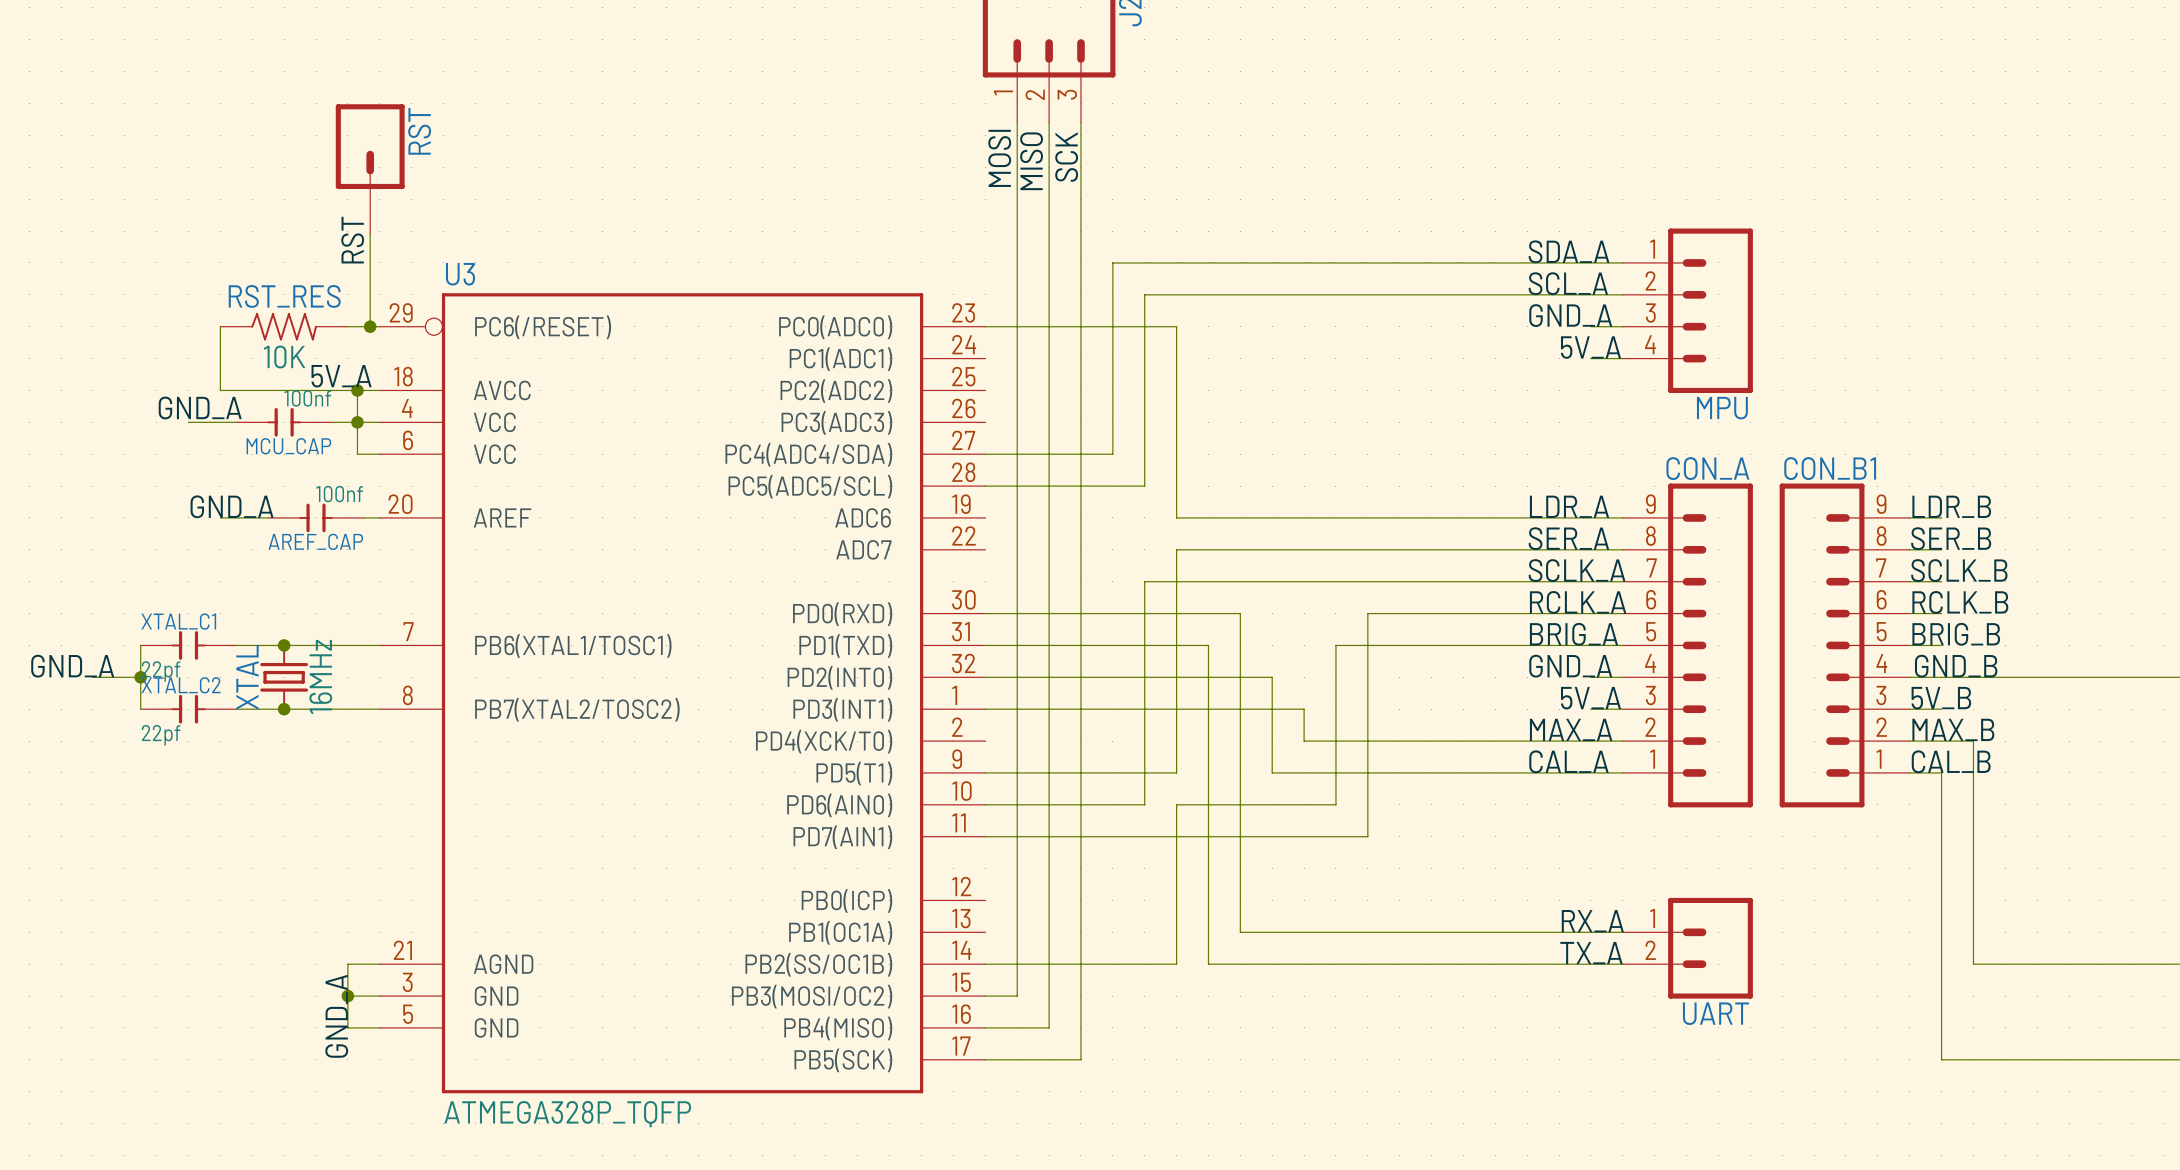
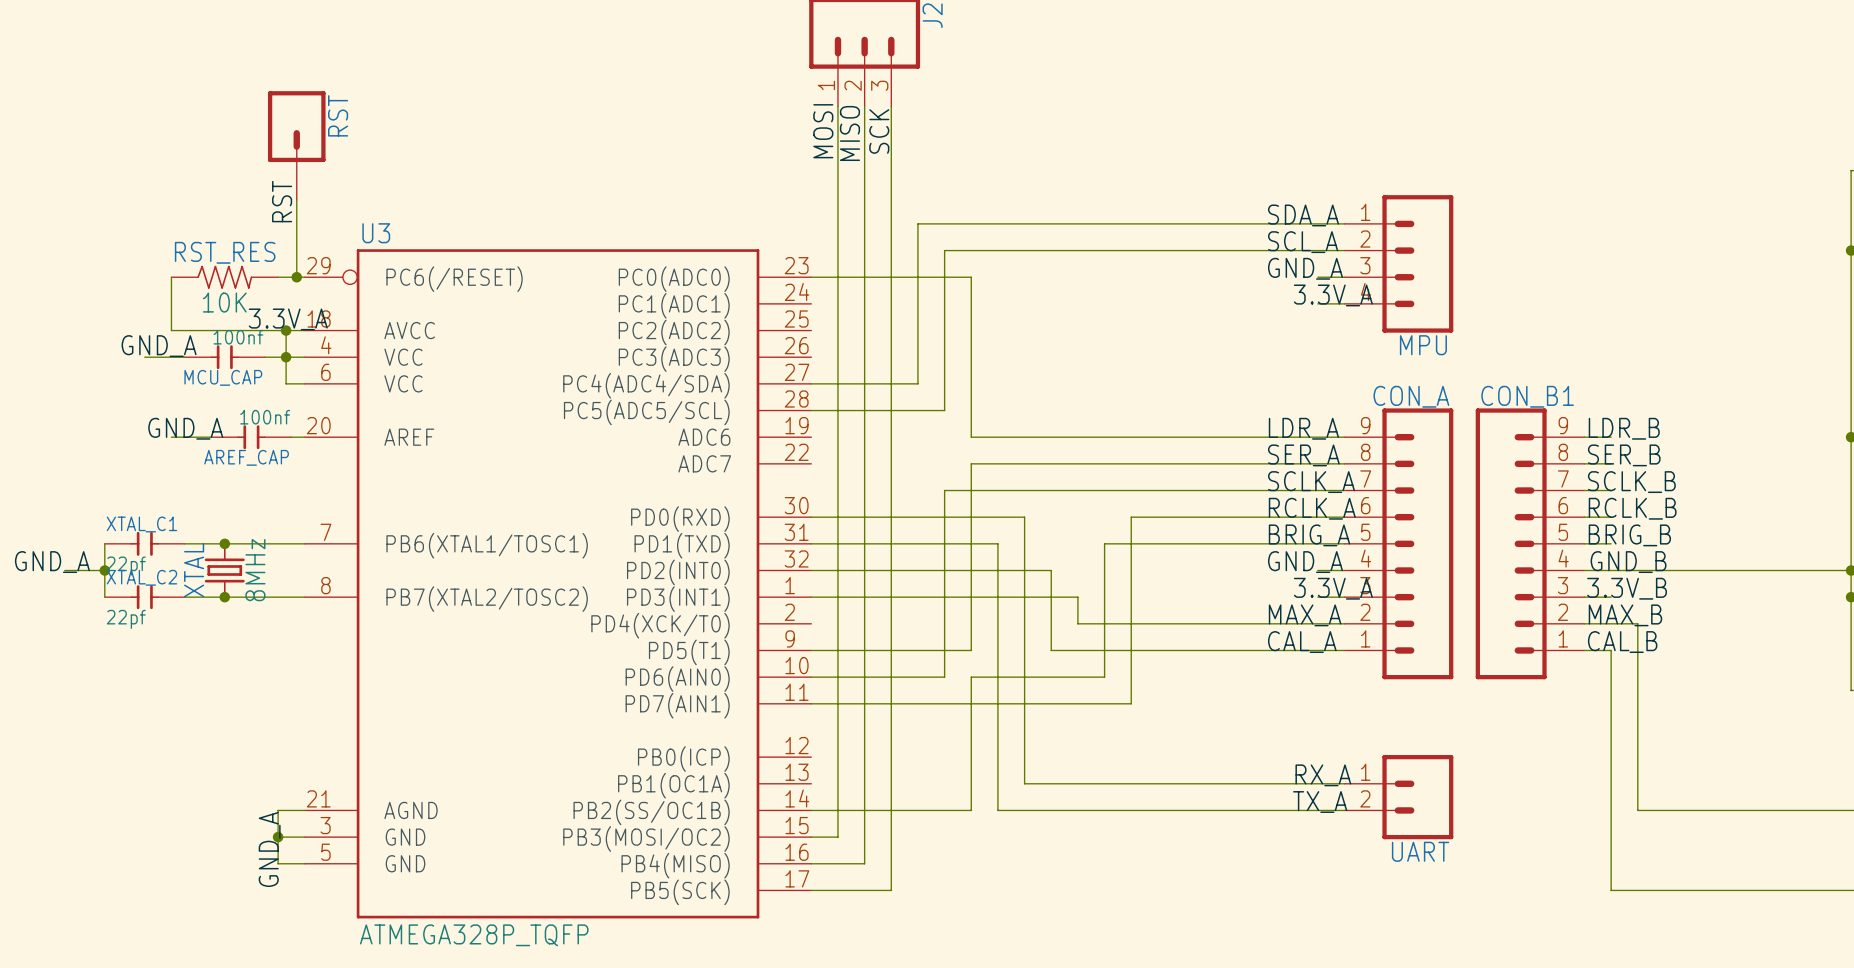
label: 5V_A (1591, 347) -> 3.3V_A (1333, 295)
label: 5V_A (341, 376) -> 3.3V_A (288, 319)
XTAL value: 16MHz (320, 677) -> 8MHz (255, 570)
label: 5V_A (1591, 698) -> 3.3V_A (1333, 588)
label: 5V_B (1941, 698) -> 3.3V_B (1627, 588)

